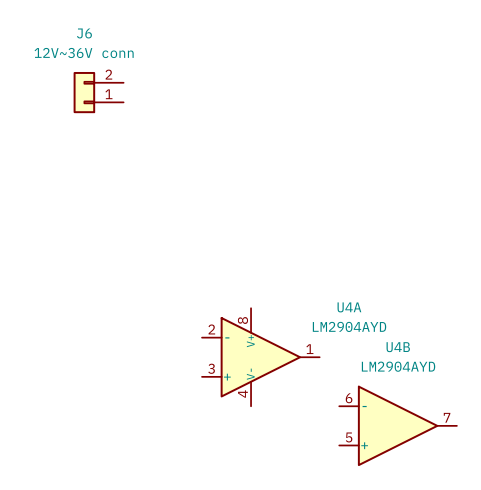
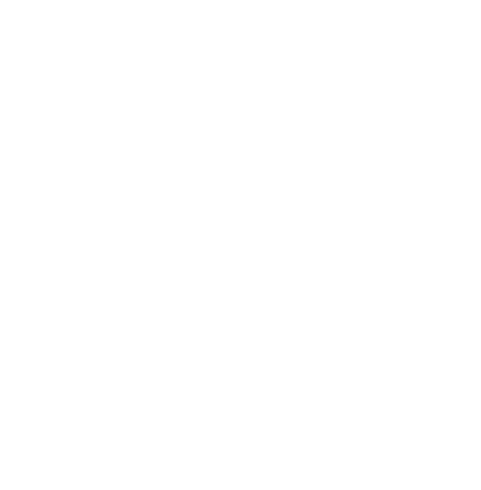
J6: 12V~36V conn (98, 92) -> none
U4A: LM2904AYD (260, 357) -> none
U4B: LM2904AYD (398, 425) -> none

